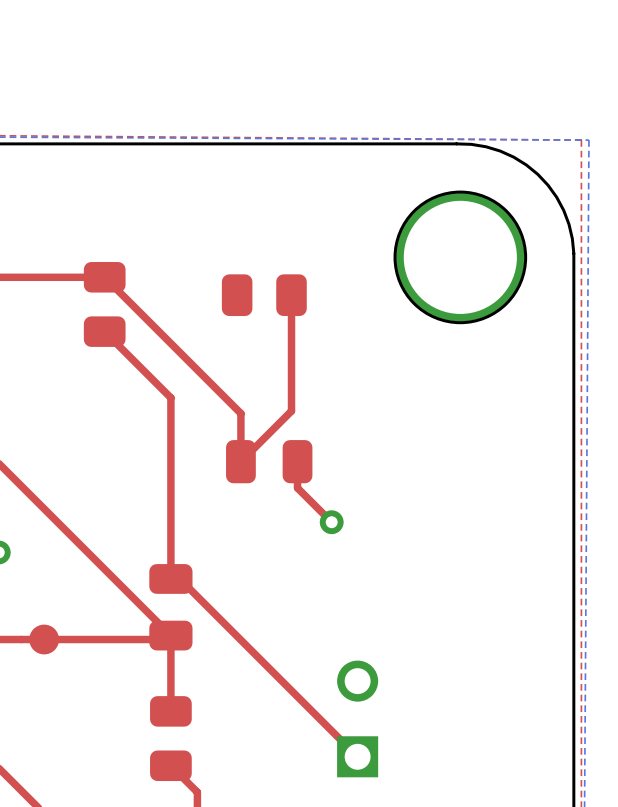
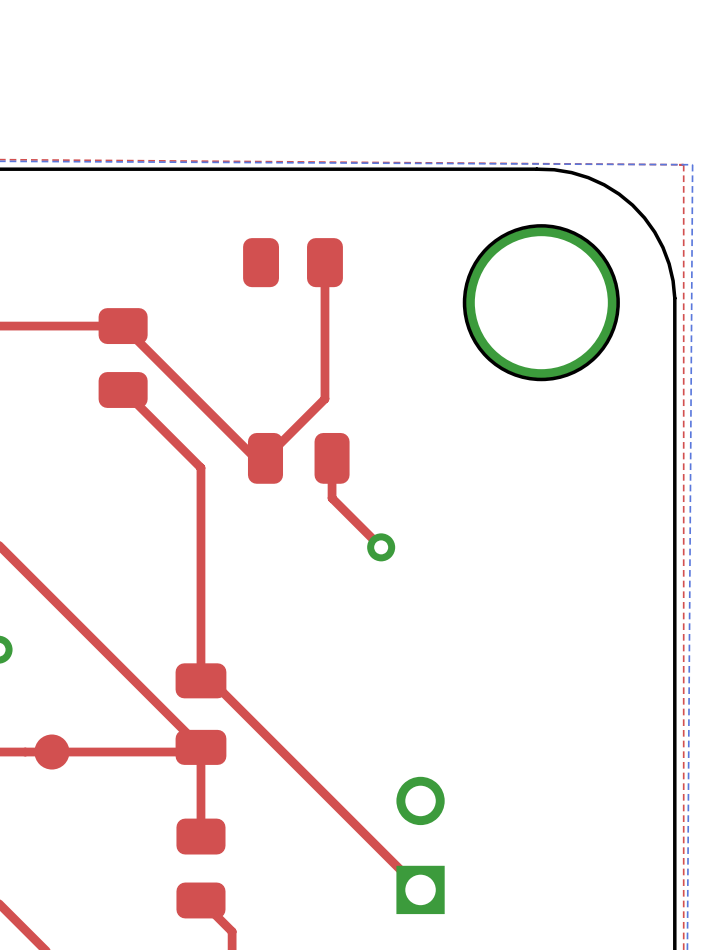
part position: (264, 295) -> (293, 262)
top track: (291, 295) (291, 411) (240, 461) -> none
top track: (217, 389) (240, 413) (240, 461) -> (255, 458) (265, 458) (324, 398) (324, 262)
top track: none -> (332, 458) (332, 498) (381, 547)
part position: (269, 461) -> (298, 458)
top track: (297, 461) (297, 488) (331, 522) -> none
via position: (331, 522) -> (381, 547)

